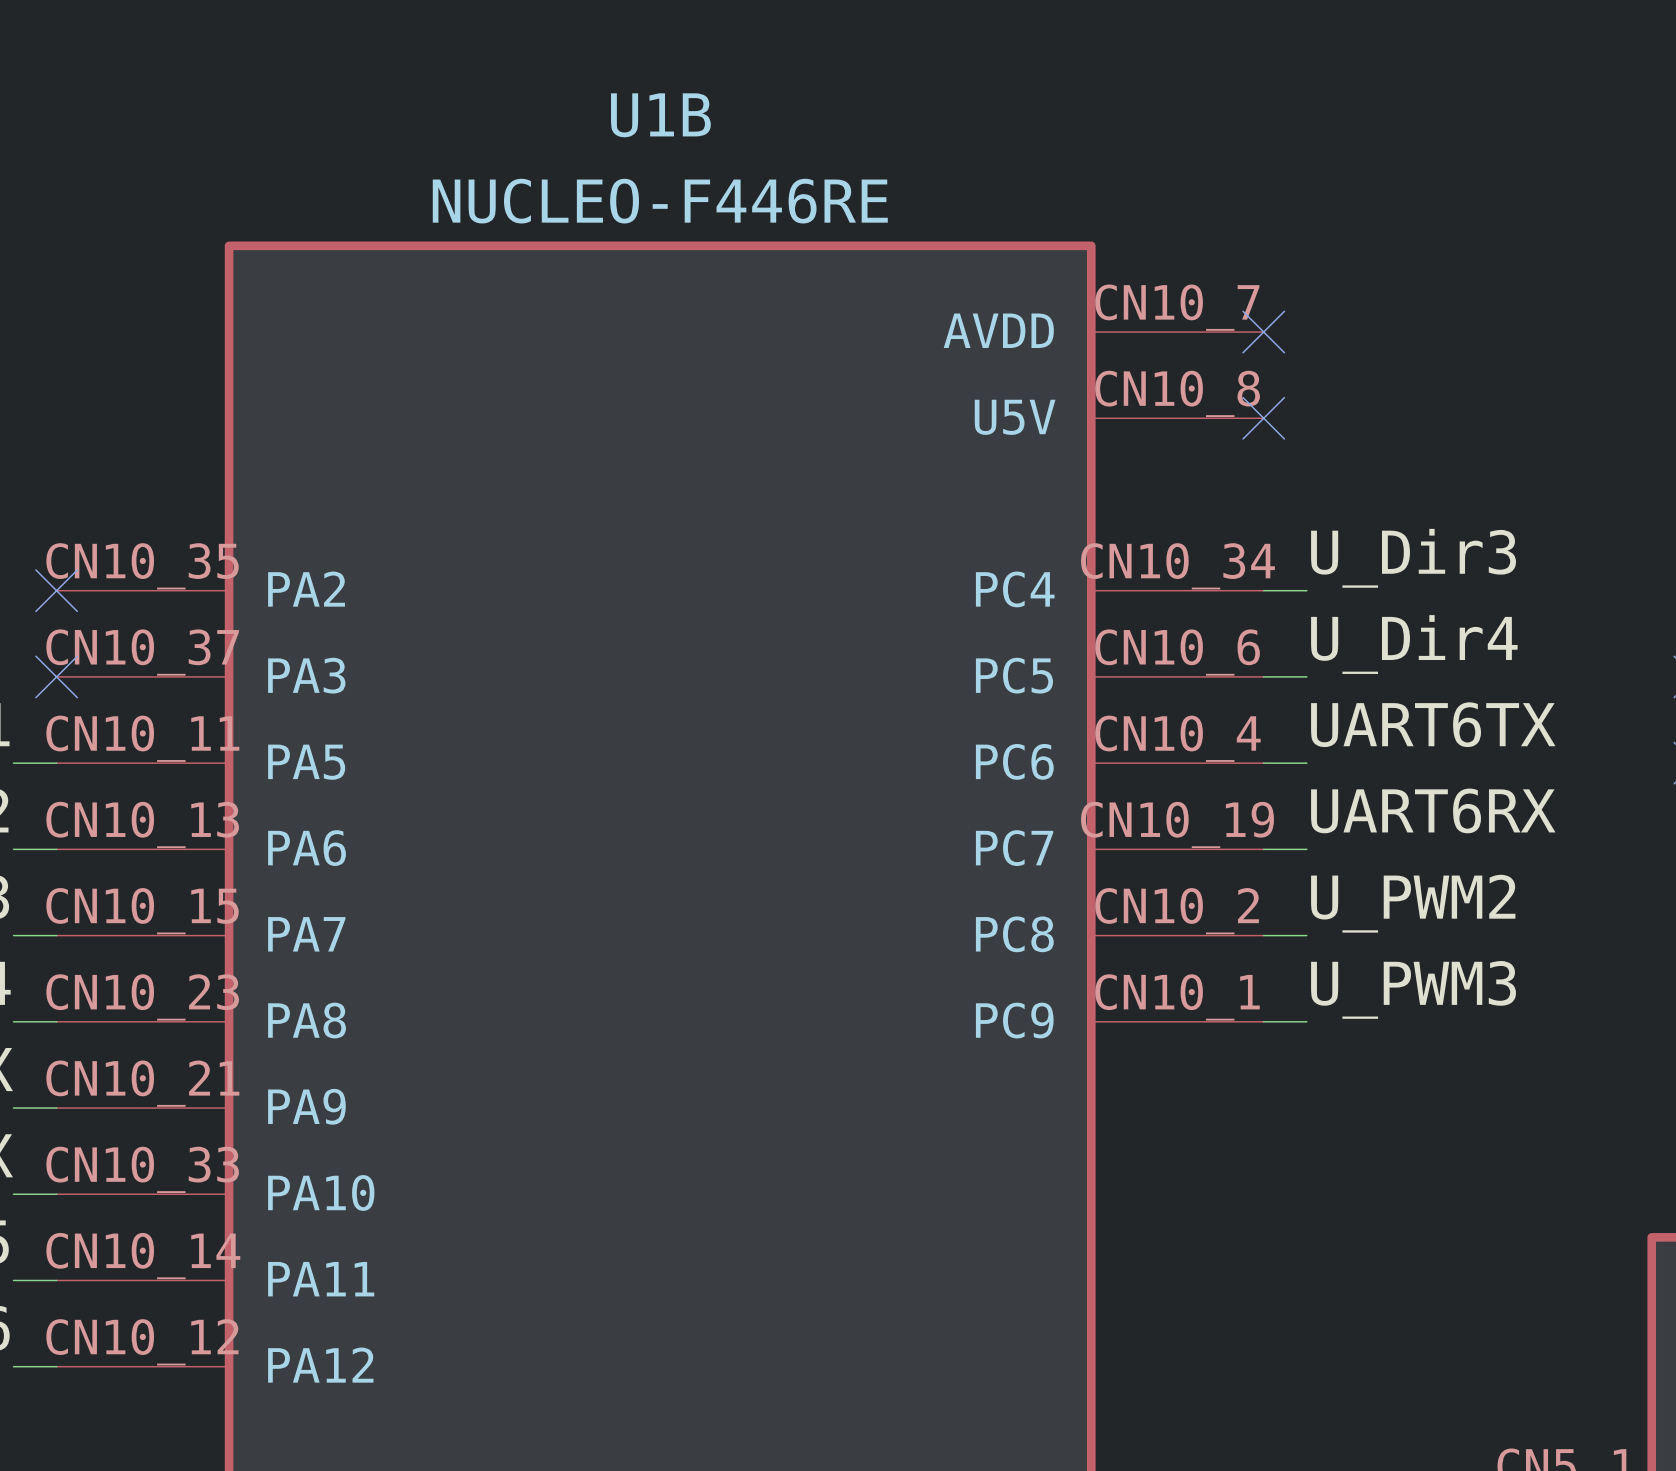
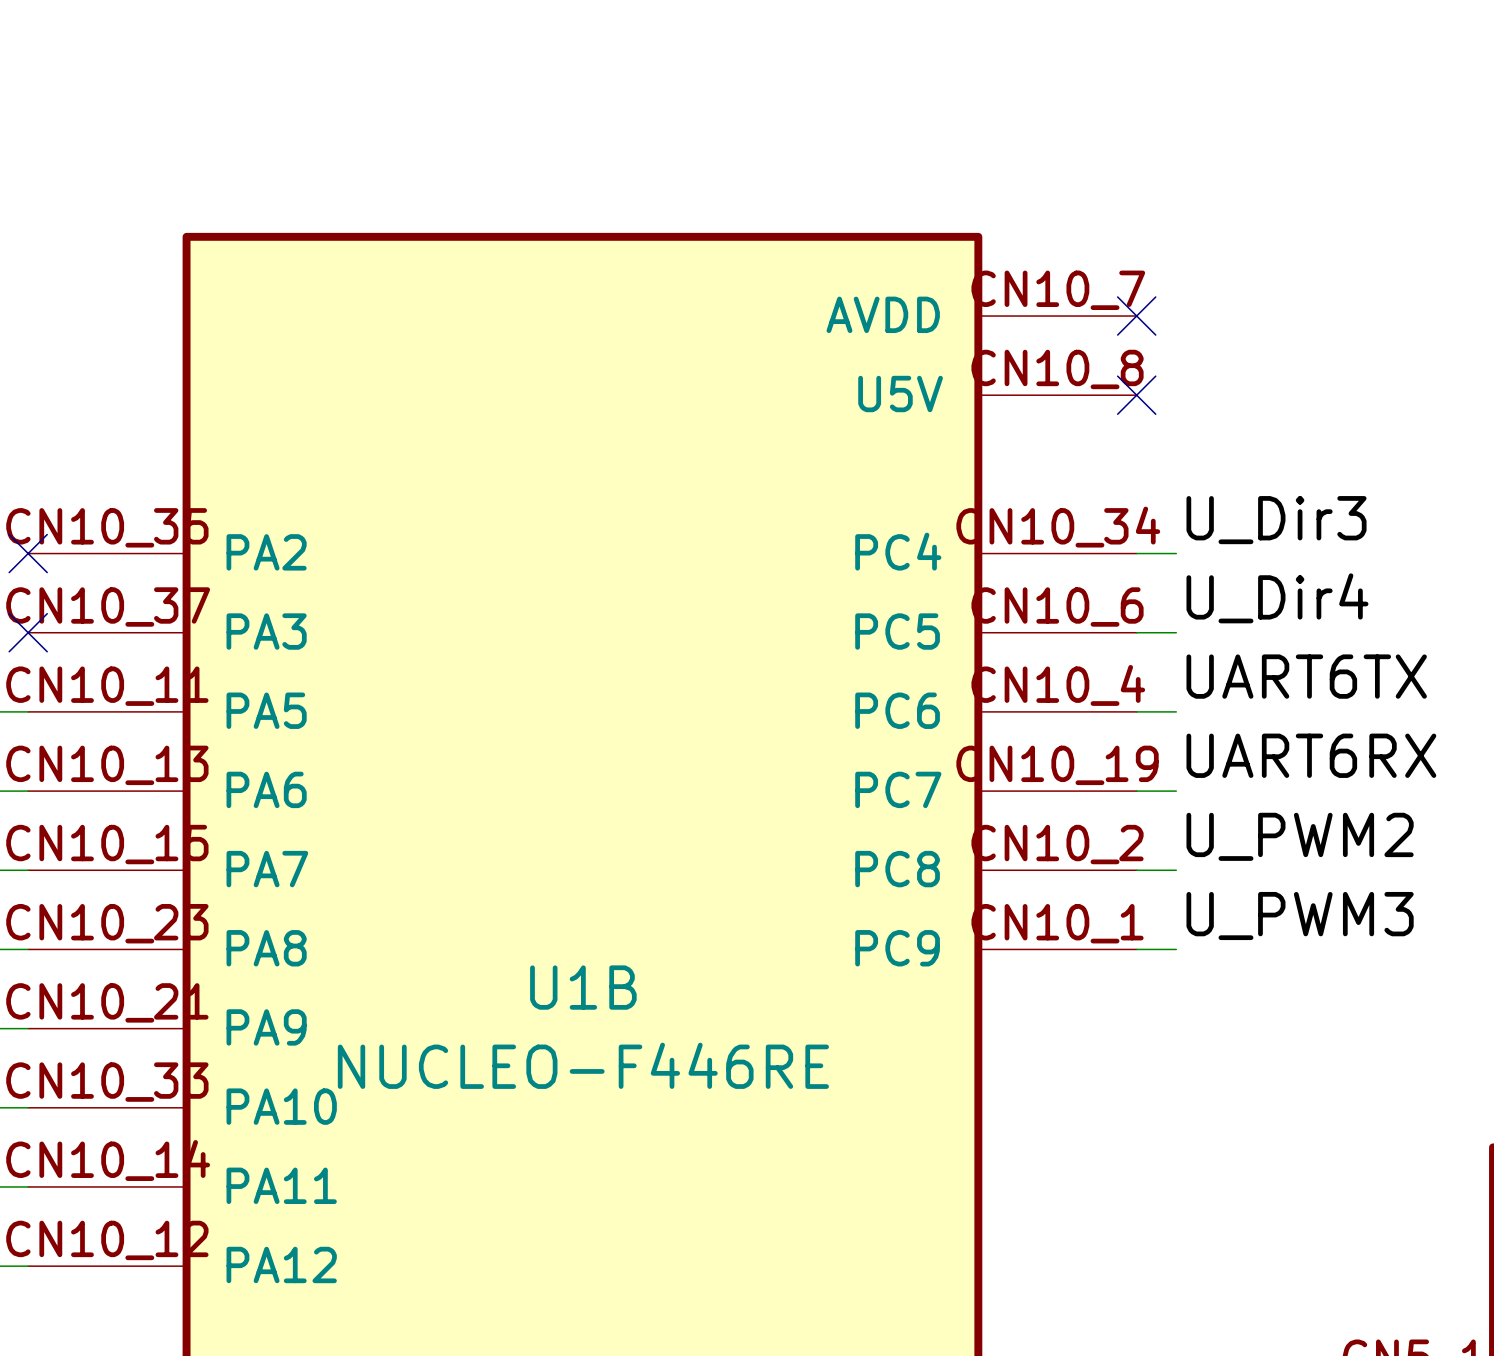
U1B name position: U1B (660, 115) -> U1B (583, 987)
U1B value position: NUCLEO-F446RE (660, 201) -> NUCLEO-F446RE (583, 1065)

